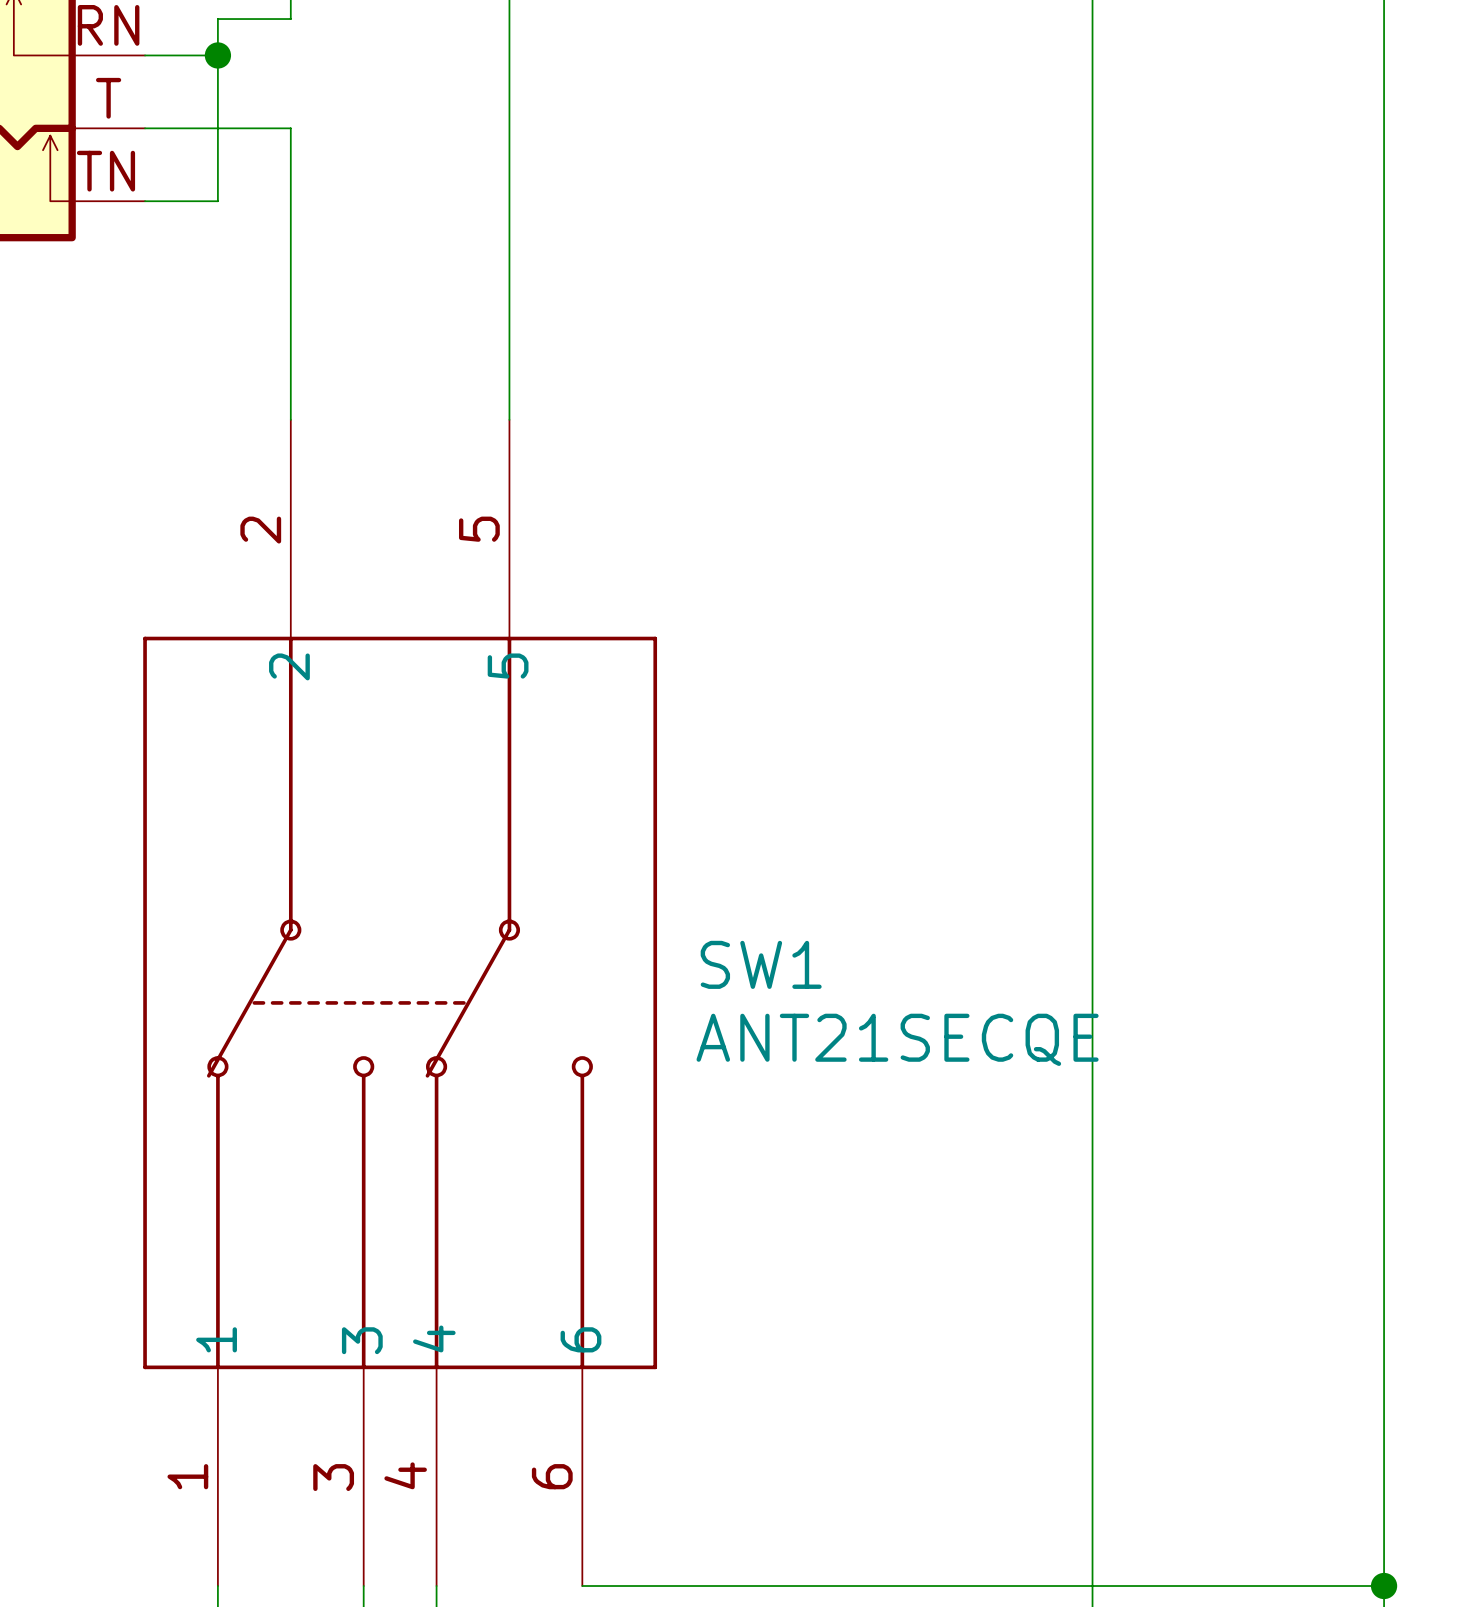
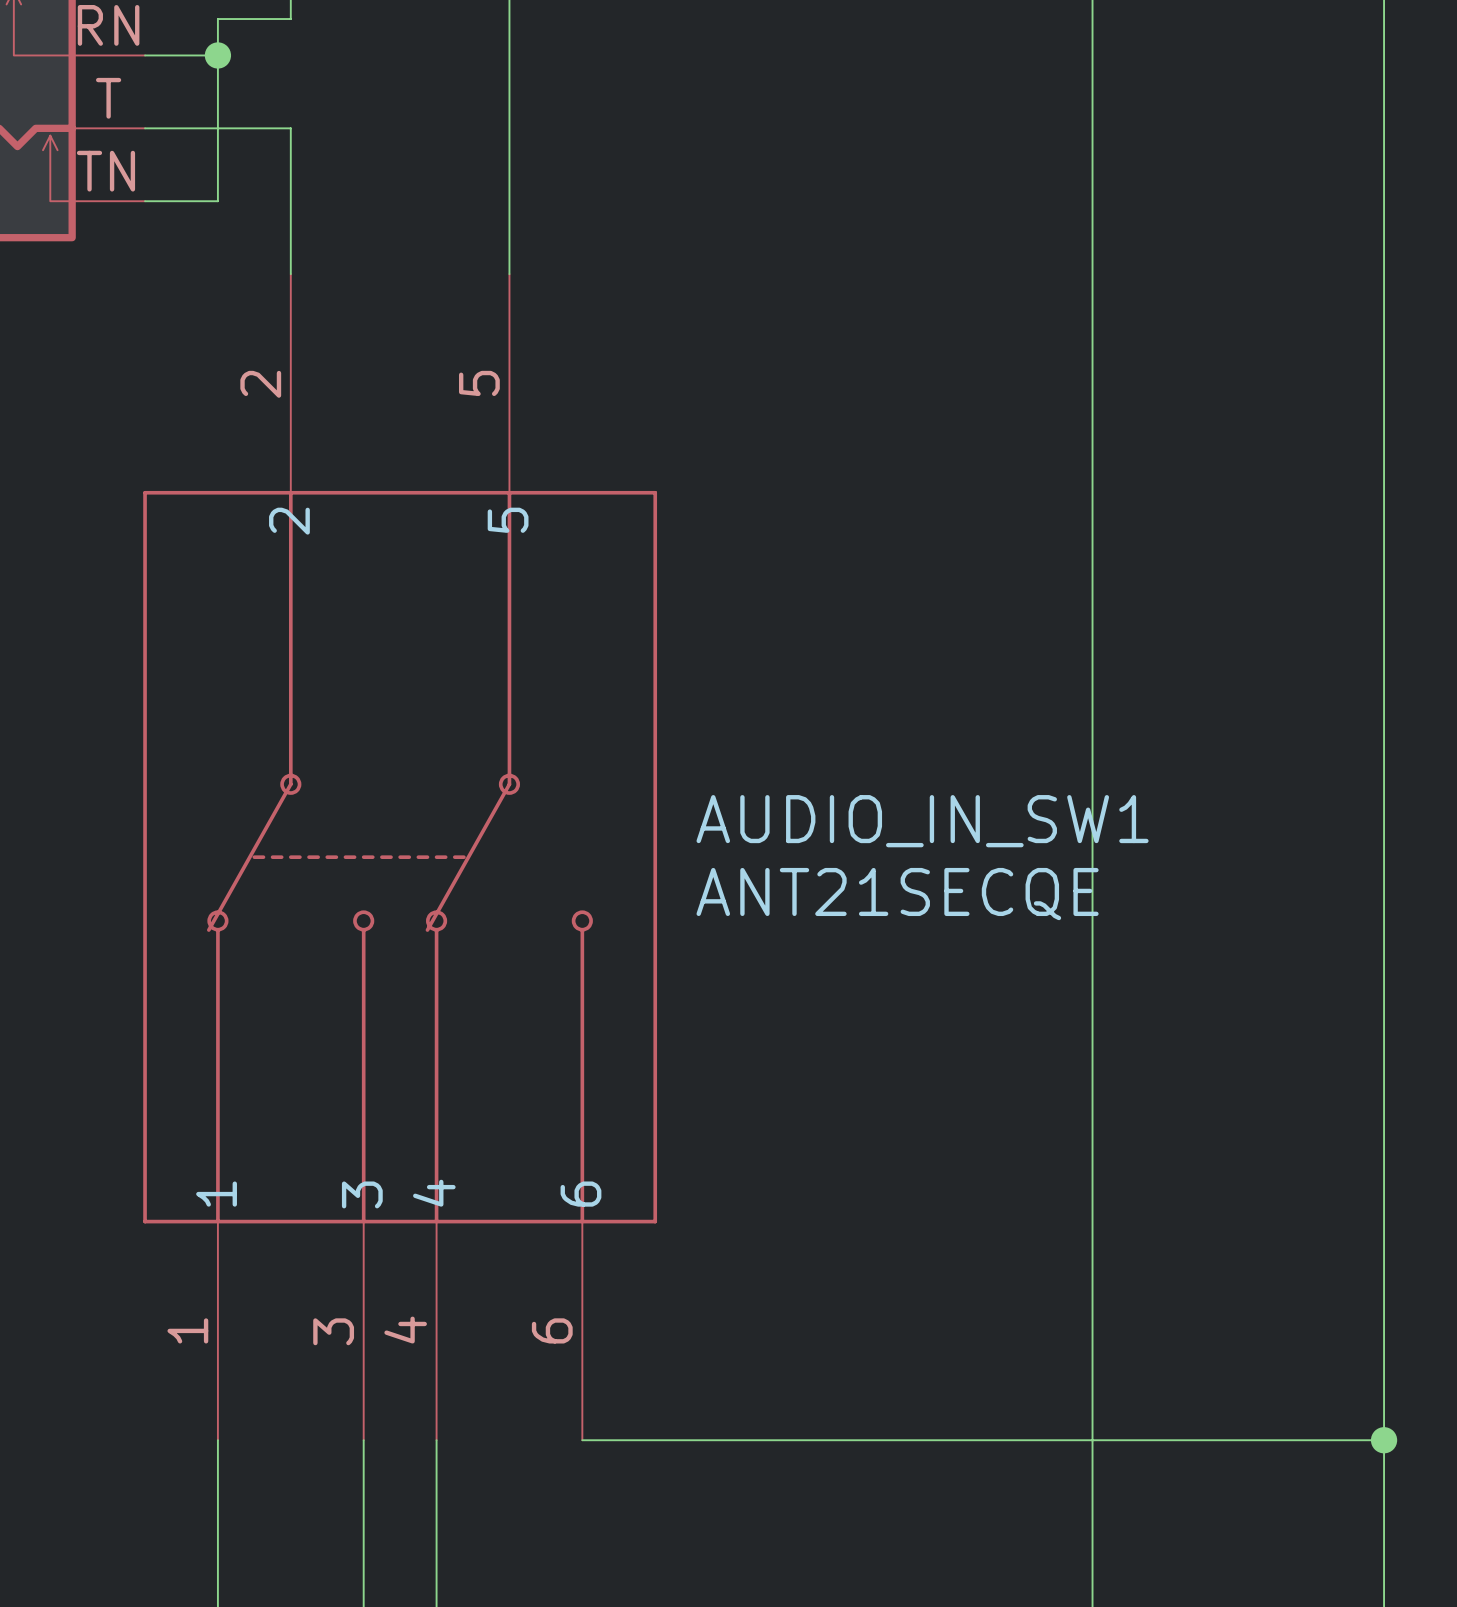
AUDIO_IN_SW1: none -> ANT21SECQE (400, 857)
SW1: ANT21SECQE (400, 1002) -> none
wire: (582, 1586) (1384, 1586) -> (582, 1440) (1384, 1440)
junction position: (1384, 1586) -> (1384, 1440)

